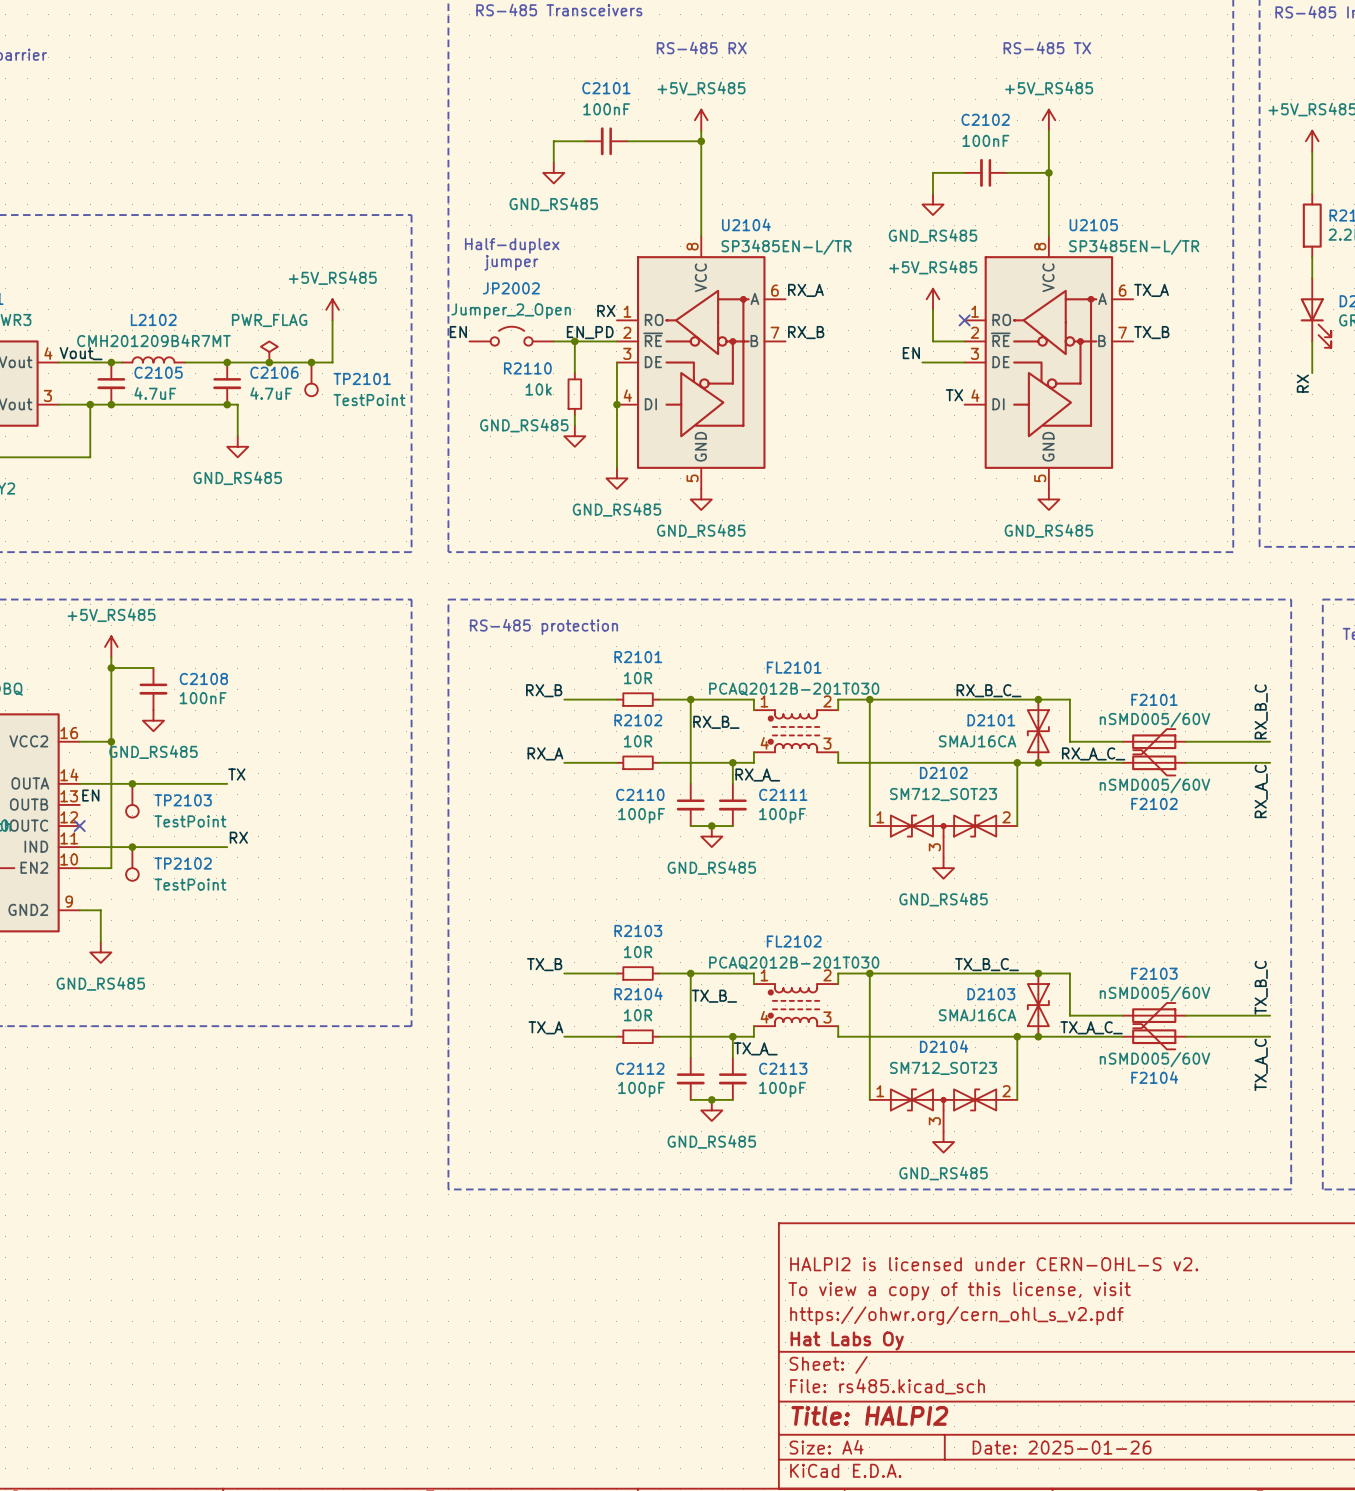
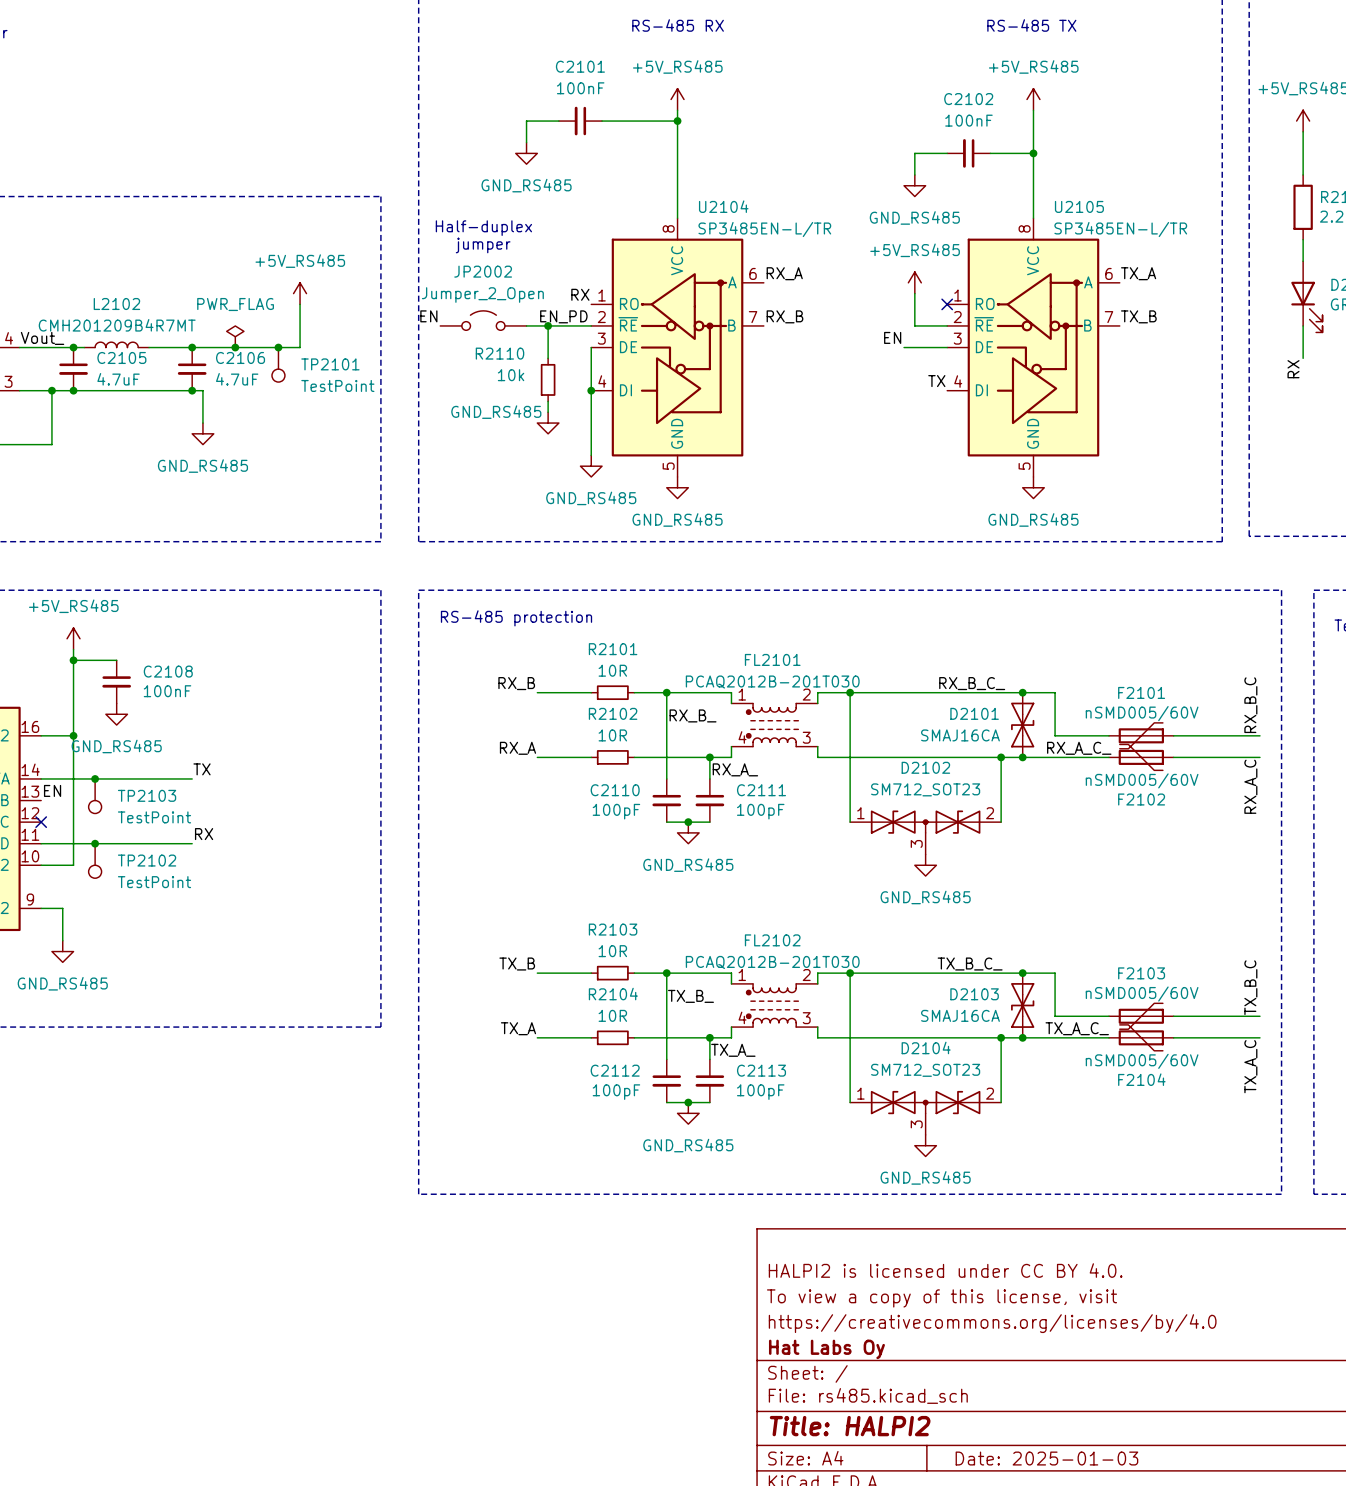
title block: HALPI2 is licensed under CERN-OHL-S v2. (994, 1264) -> HALPI2 is licensed under CC BY 4.0. (945, 1270)
title block: https://ohwr.org/cern_ohl_s_v2.pdf (956, 1315) -> https://creativecommons.org/licenses/by/4.0 (992, 1323)
title block: Date: 2025-01-26 (1062, 1447) -> Date: 2025-01-03 (1046, 1458)

